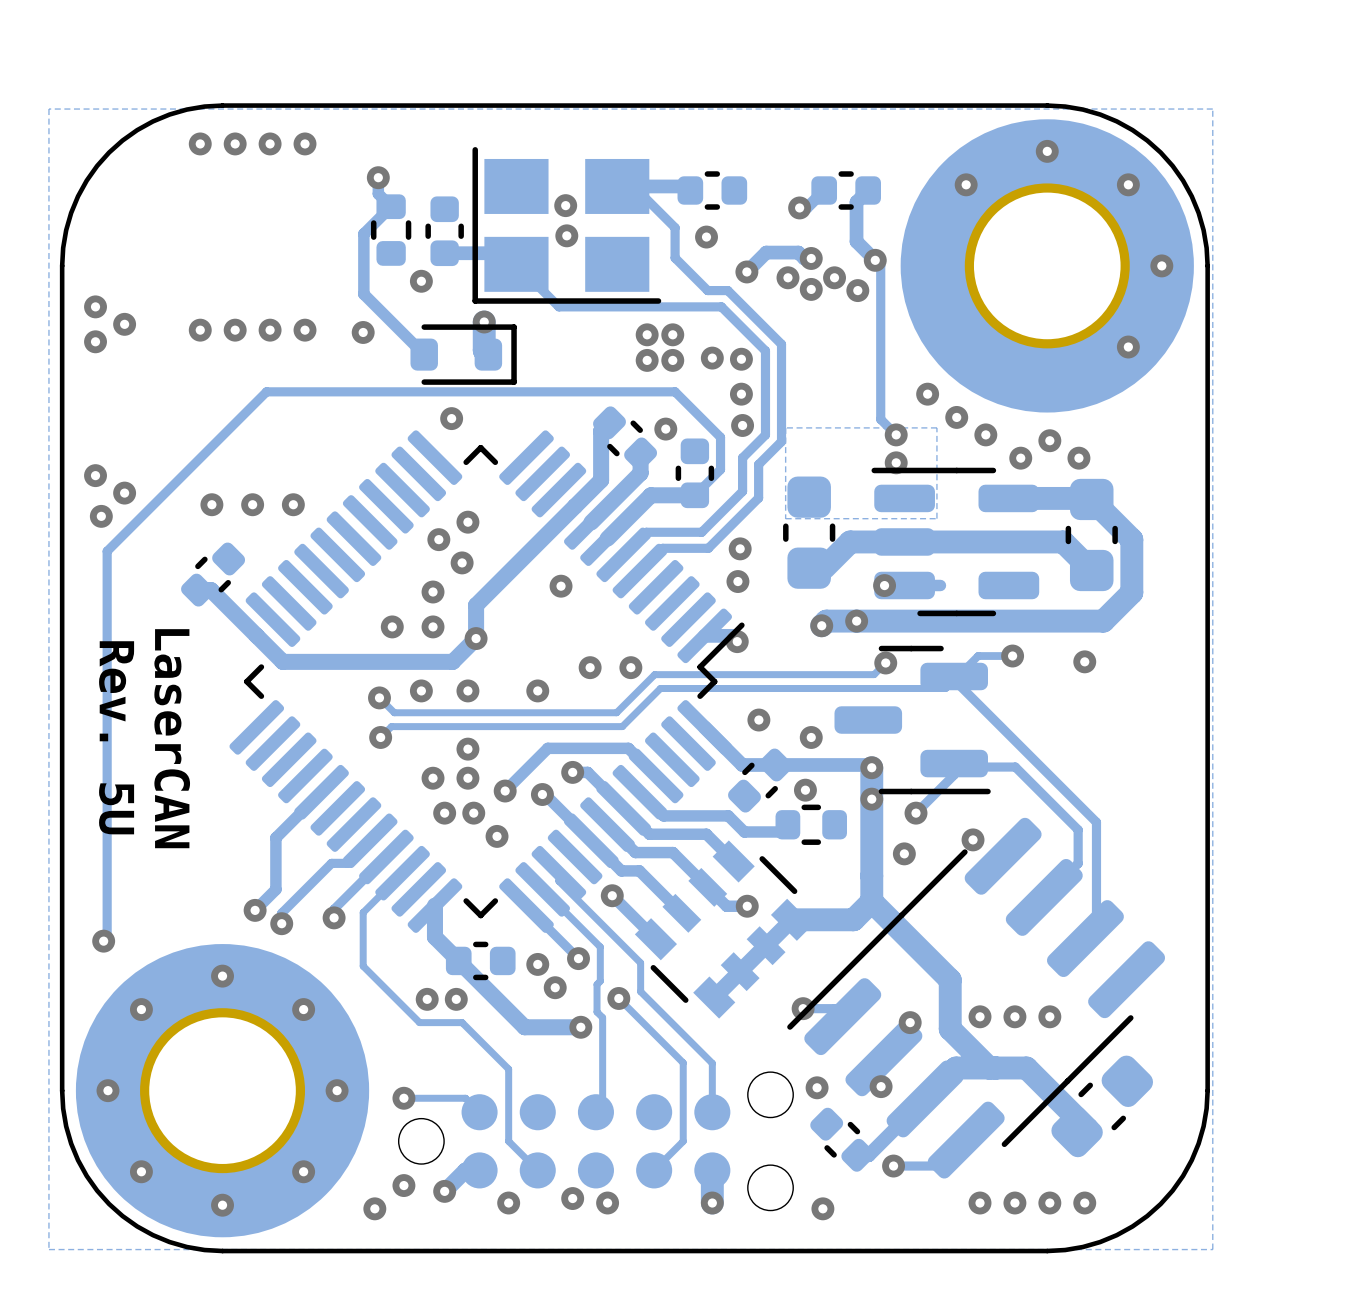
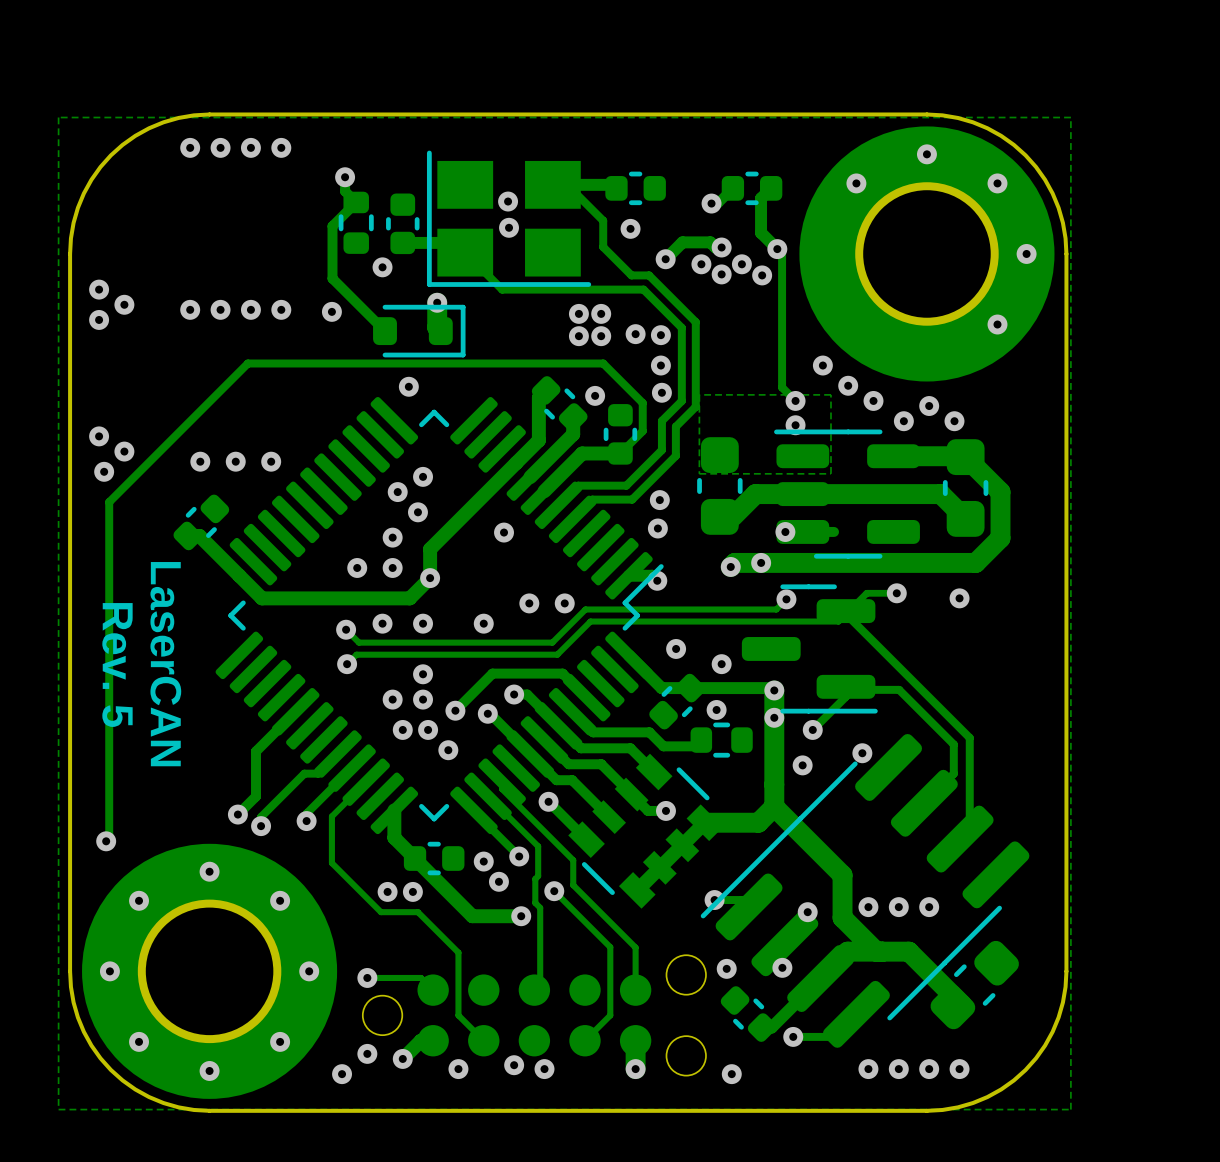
text: Rev. 5U (116, 737) -> Rev. 5 (117, 665)

